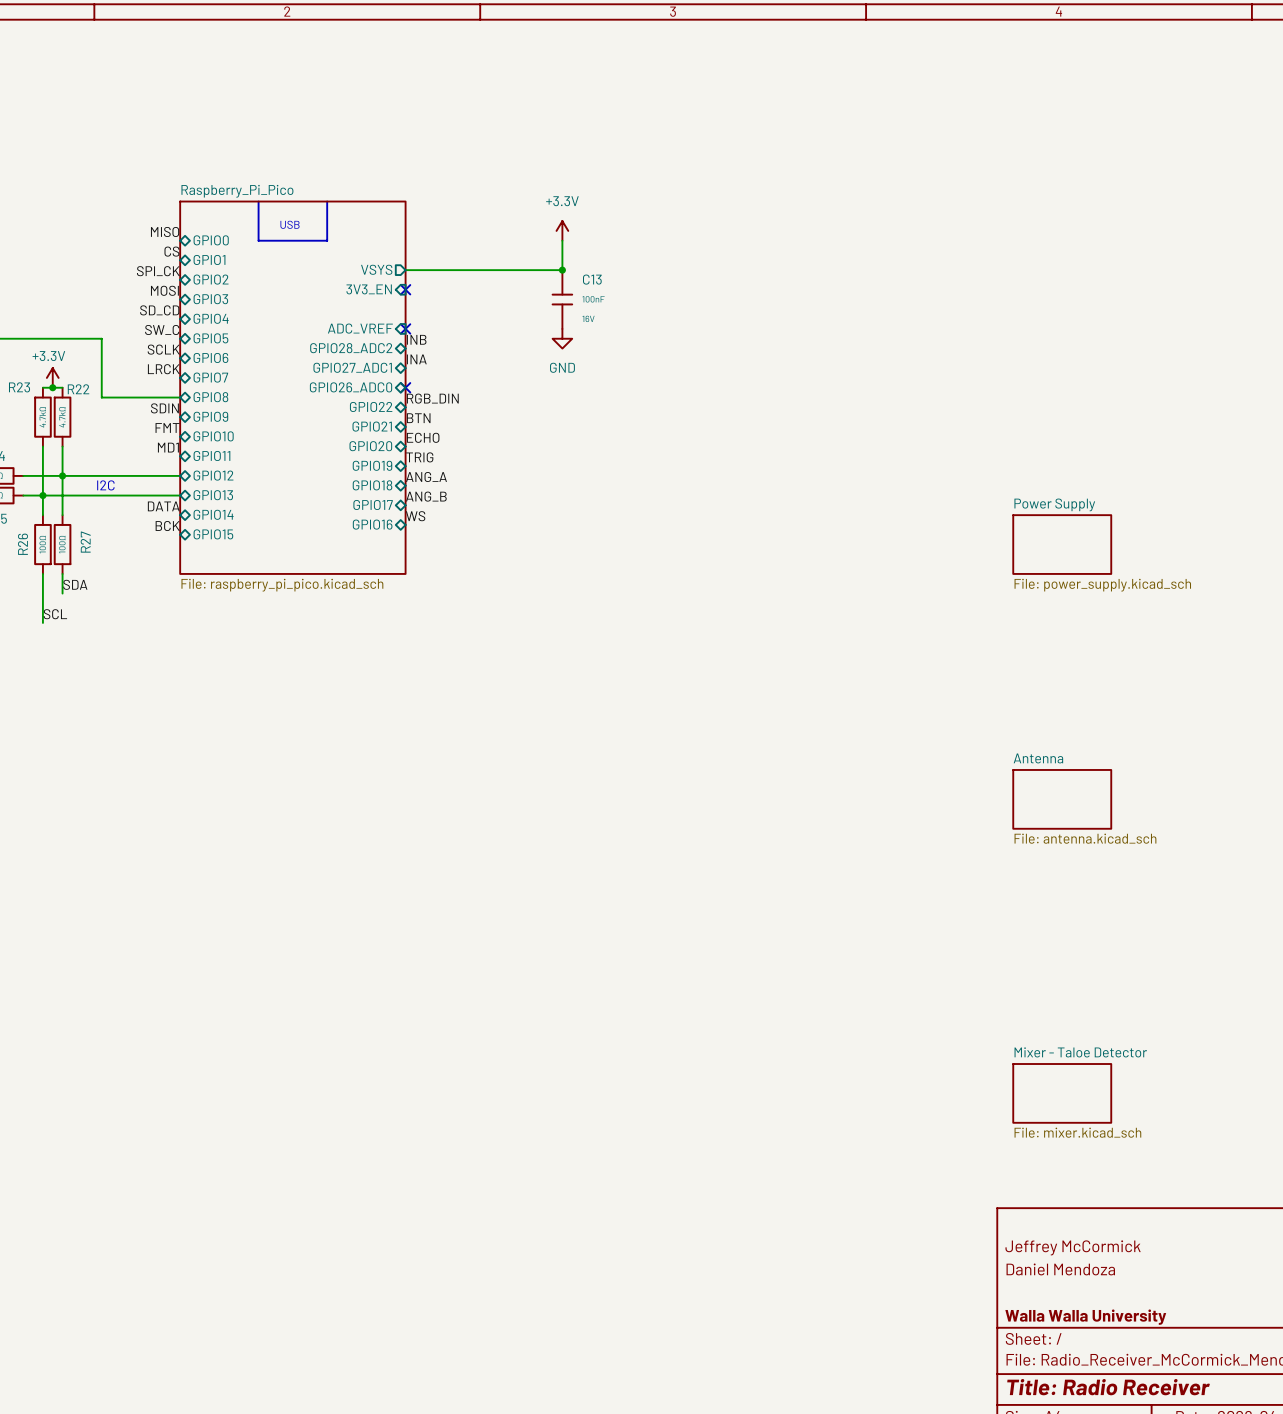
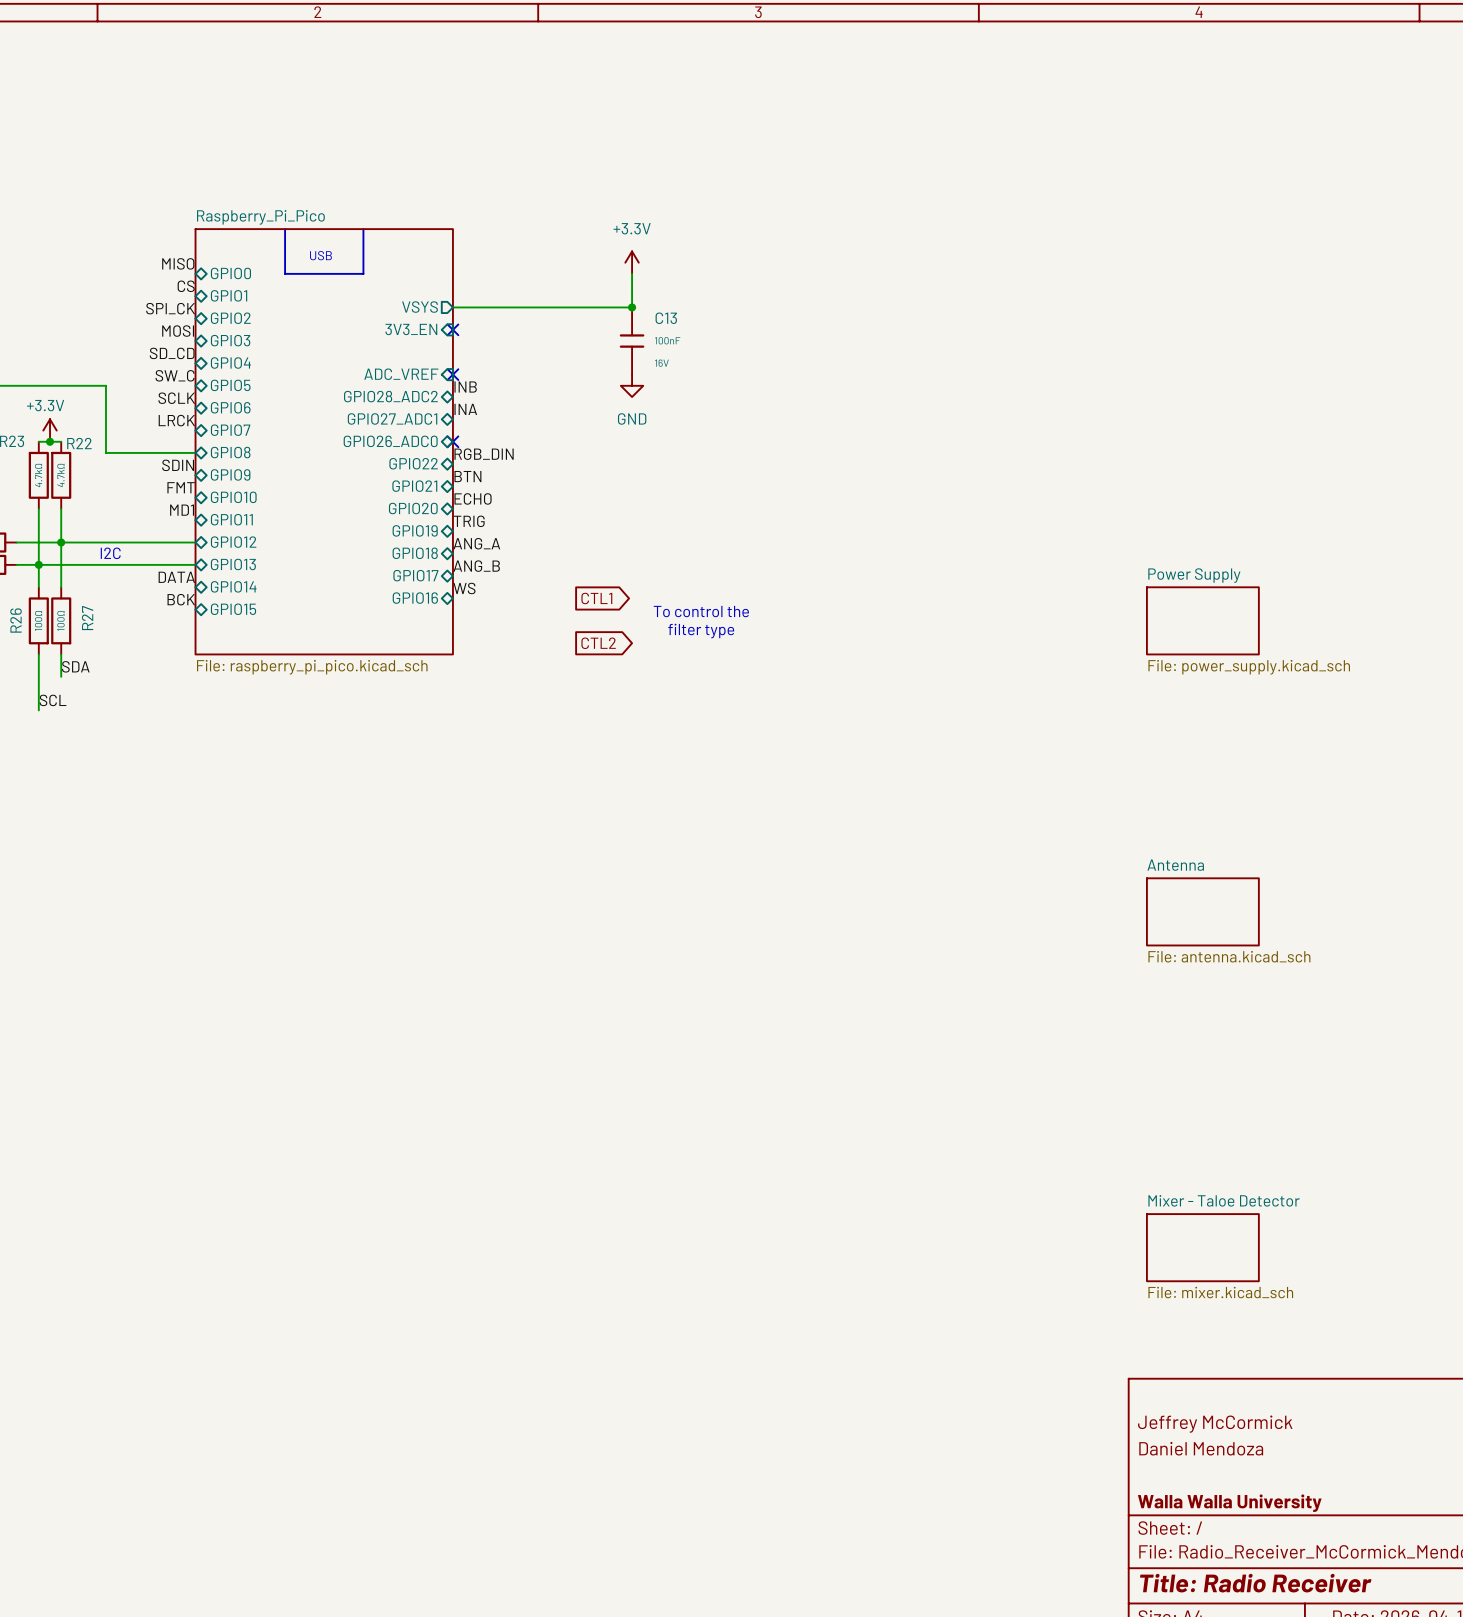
global label: none -> CTL1 (596, 598)
text: none -> To control the (701, 611)
text: none -> filter type (701, 631)
global label: none -> CTL2 (598, 643)

